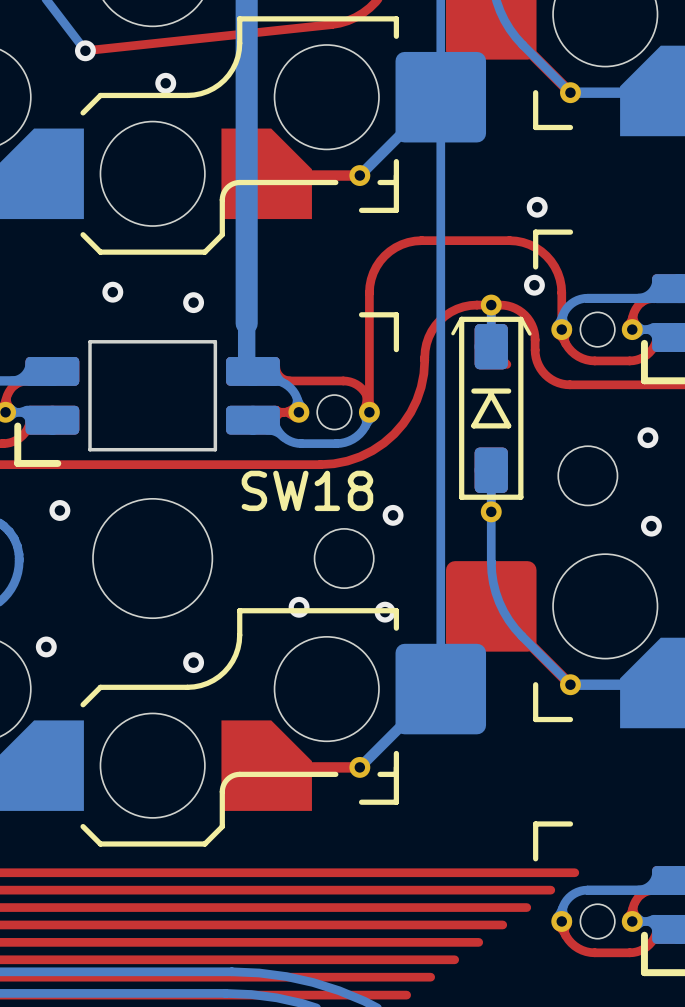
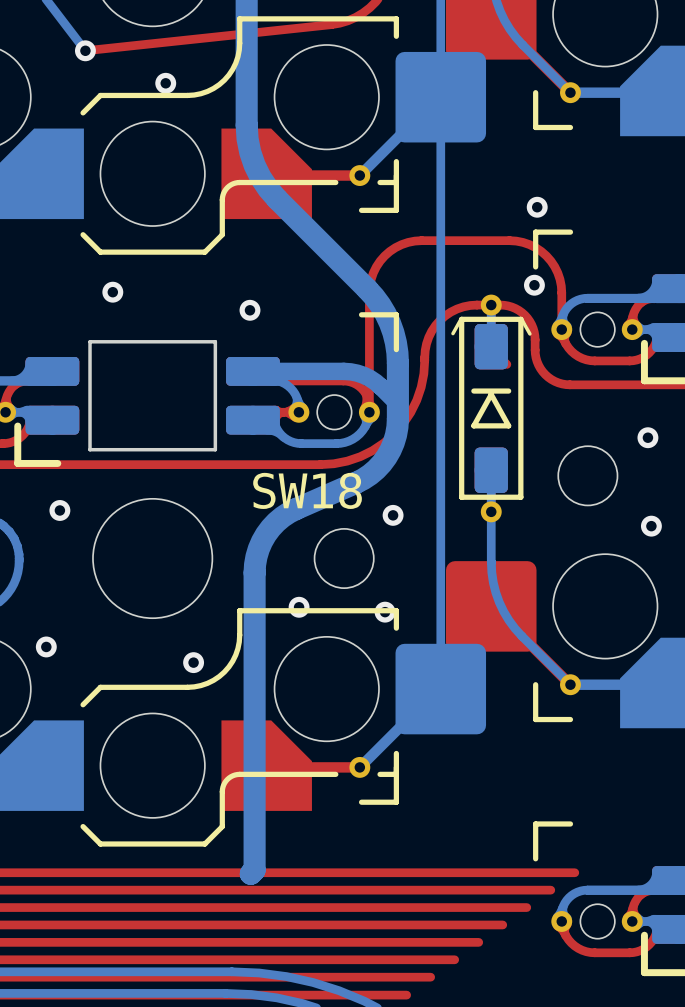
bottom track: (246, 125) (246, 365) (252, 371) -> (397, 403) (375, 382) (357, 373) (343, 371) (252, 371)
bottom track: none -> (246, 125) (247, 138) (254, 165) (268, 188) (367, 289) (380, 305) (393, 332) (397, 363) (397, 427) (393, 442) (386, 457) (376, 469) (363, 479) (282, 517) (265, 534) (256, 556) (254, 572) (254, 870) (250, 873)
via position: (193, 302) -> (249, 310)

